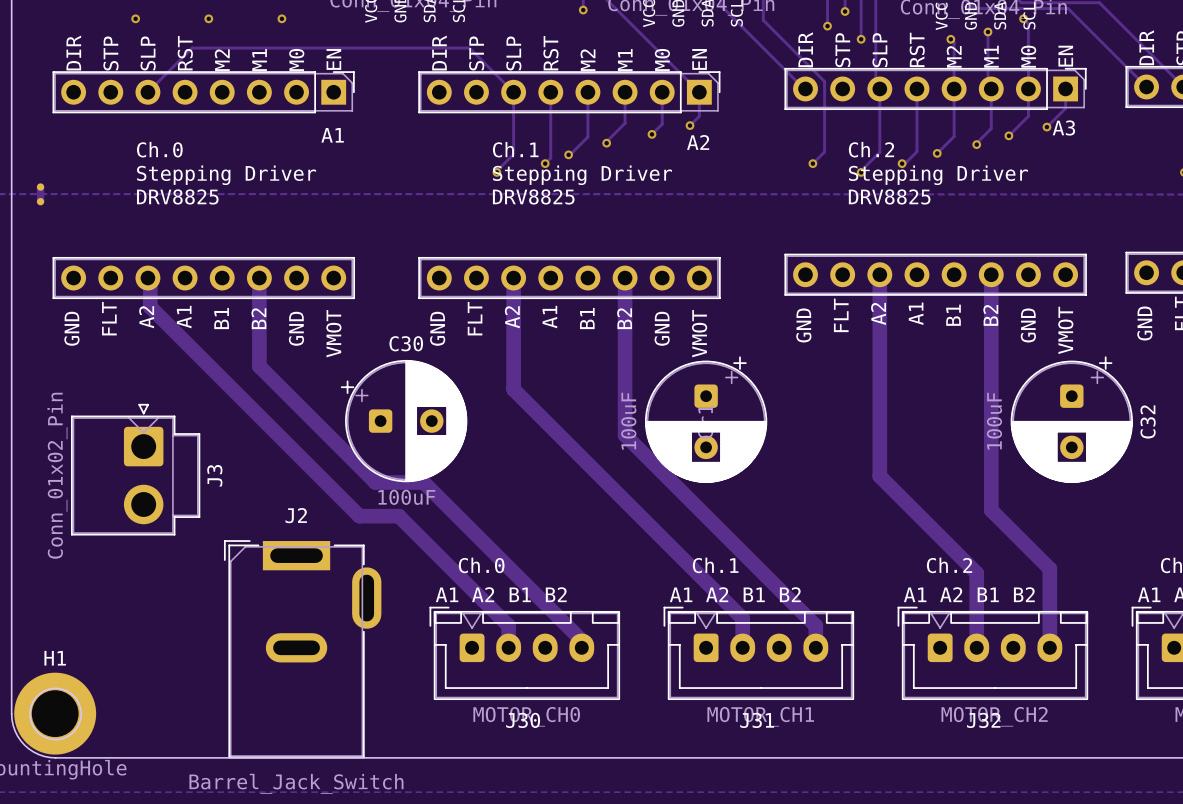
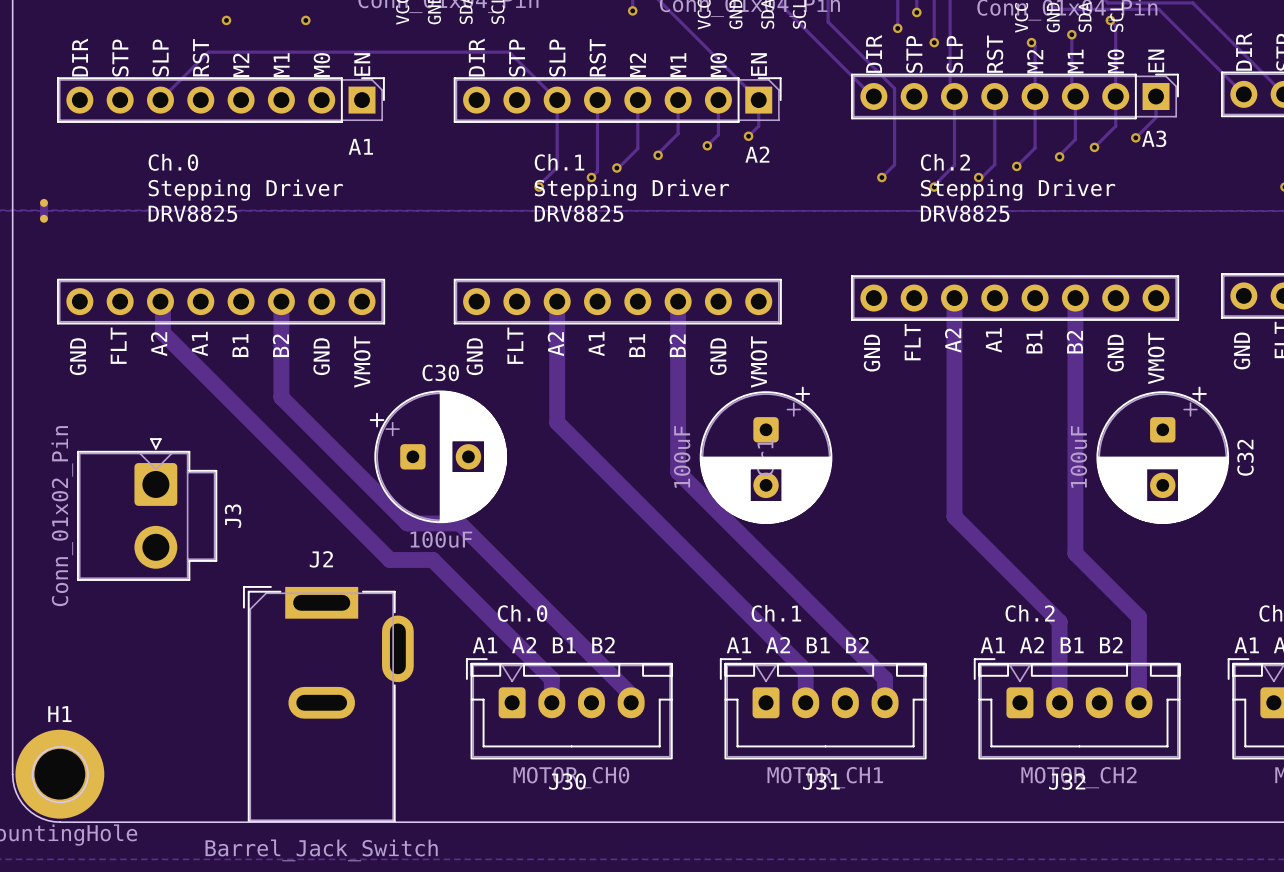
via: (135, 18) -> none

